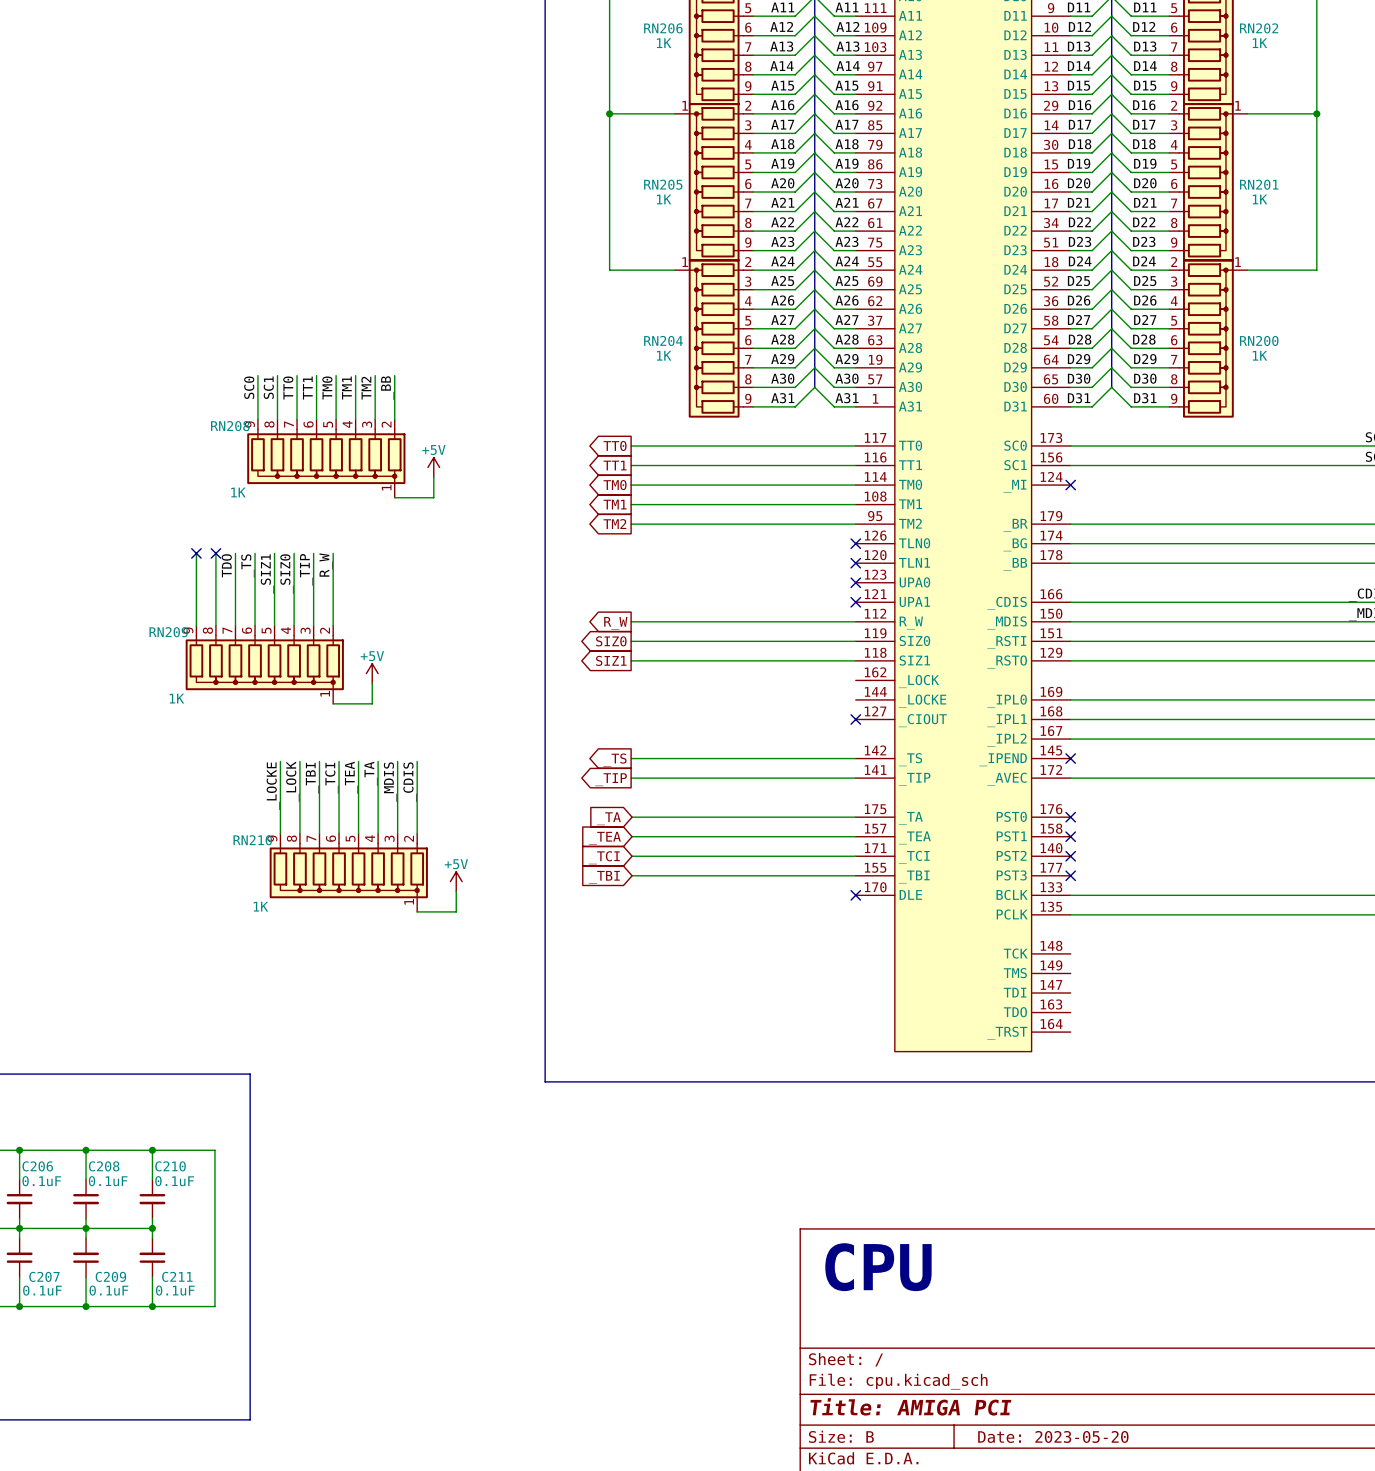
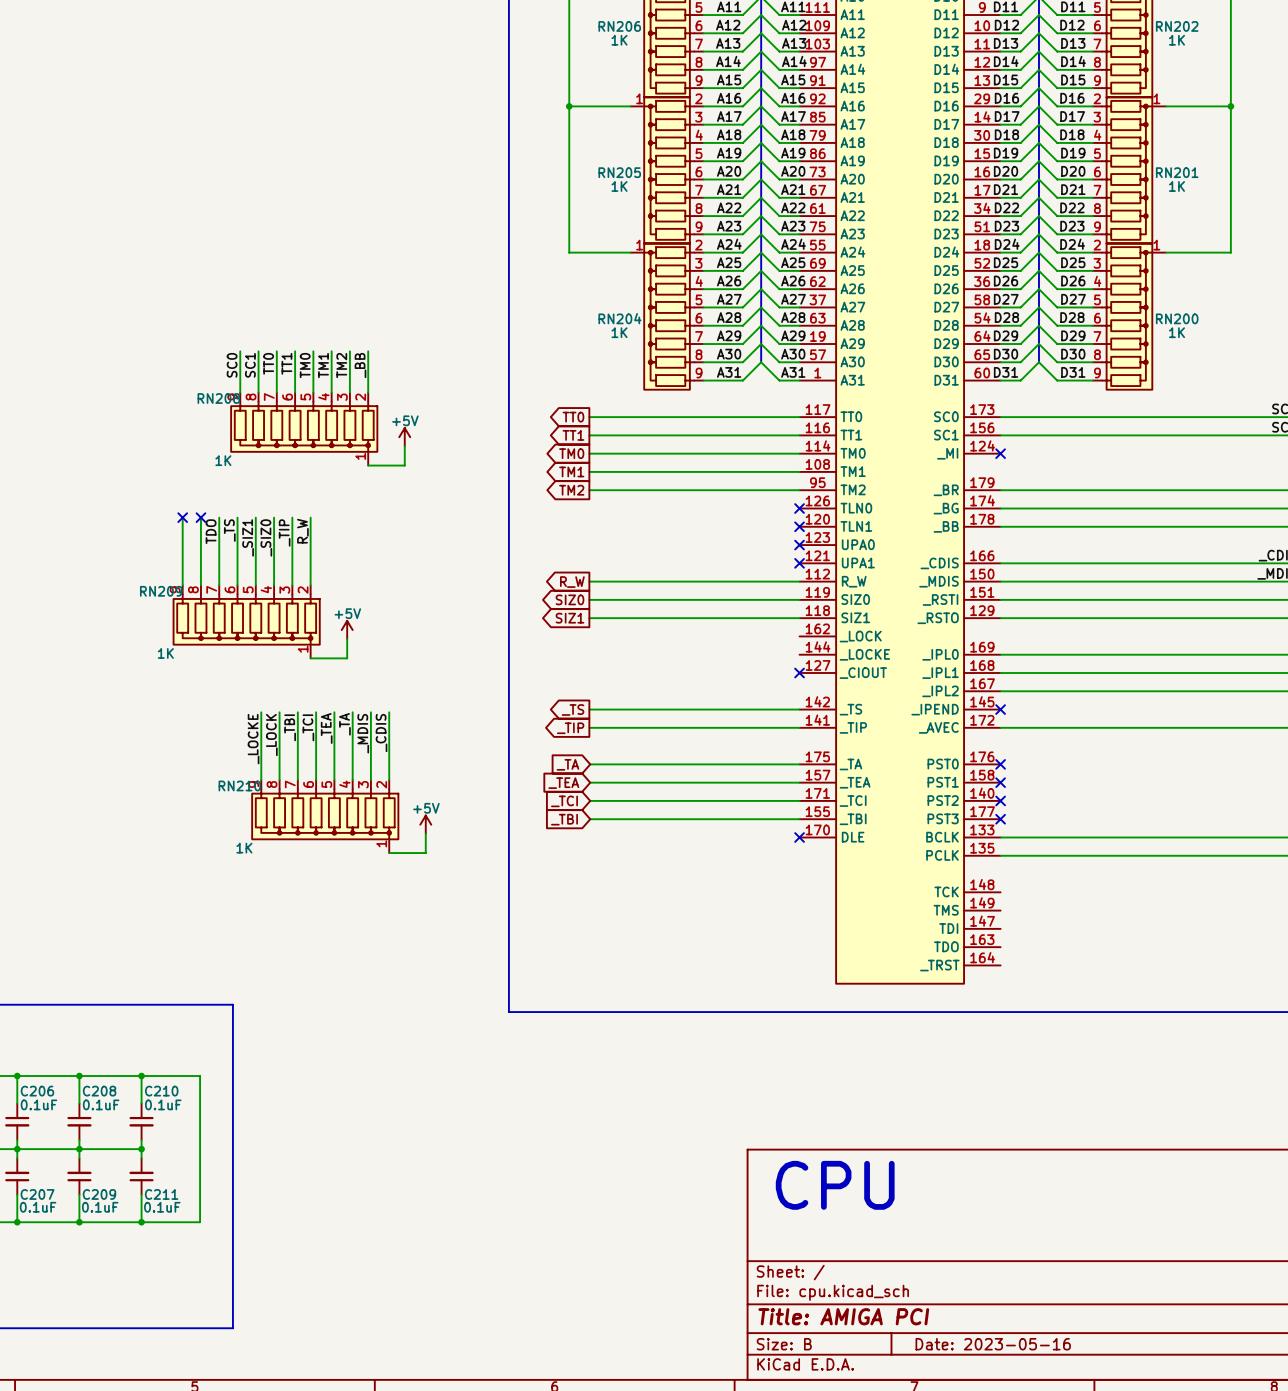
title block: Date: 2023-05-20 (1053, 1436) -> Date: 2023-05-16 (993, 1344)

